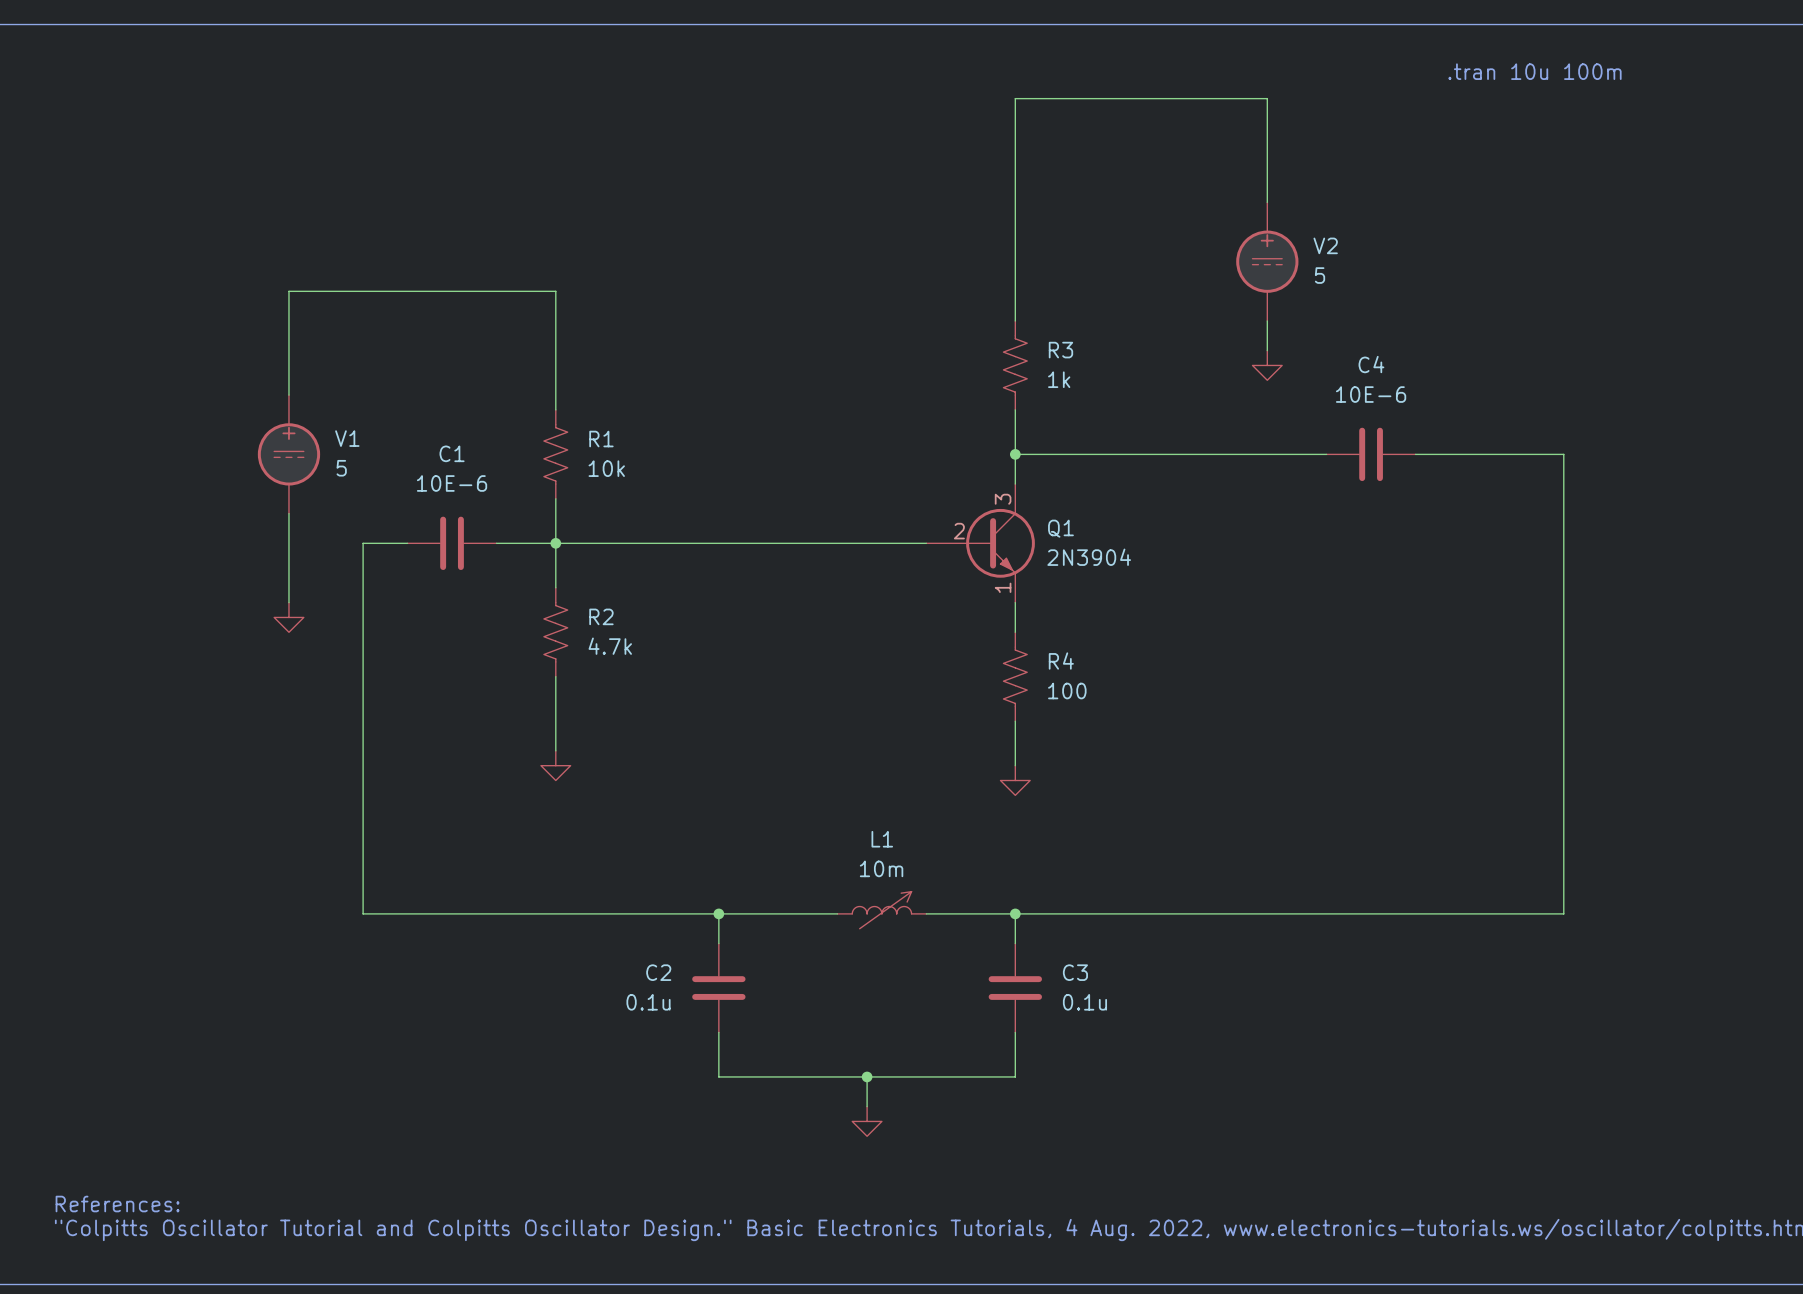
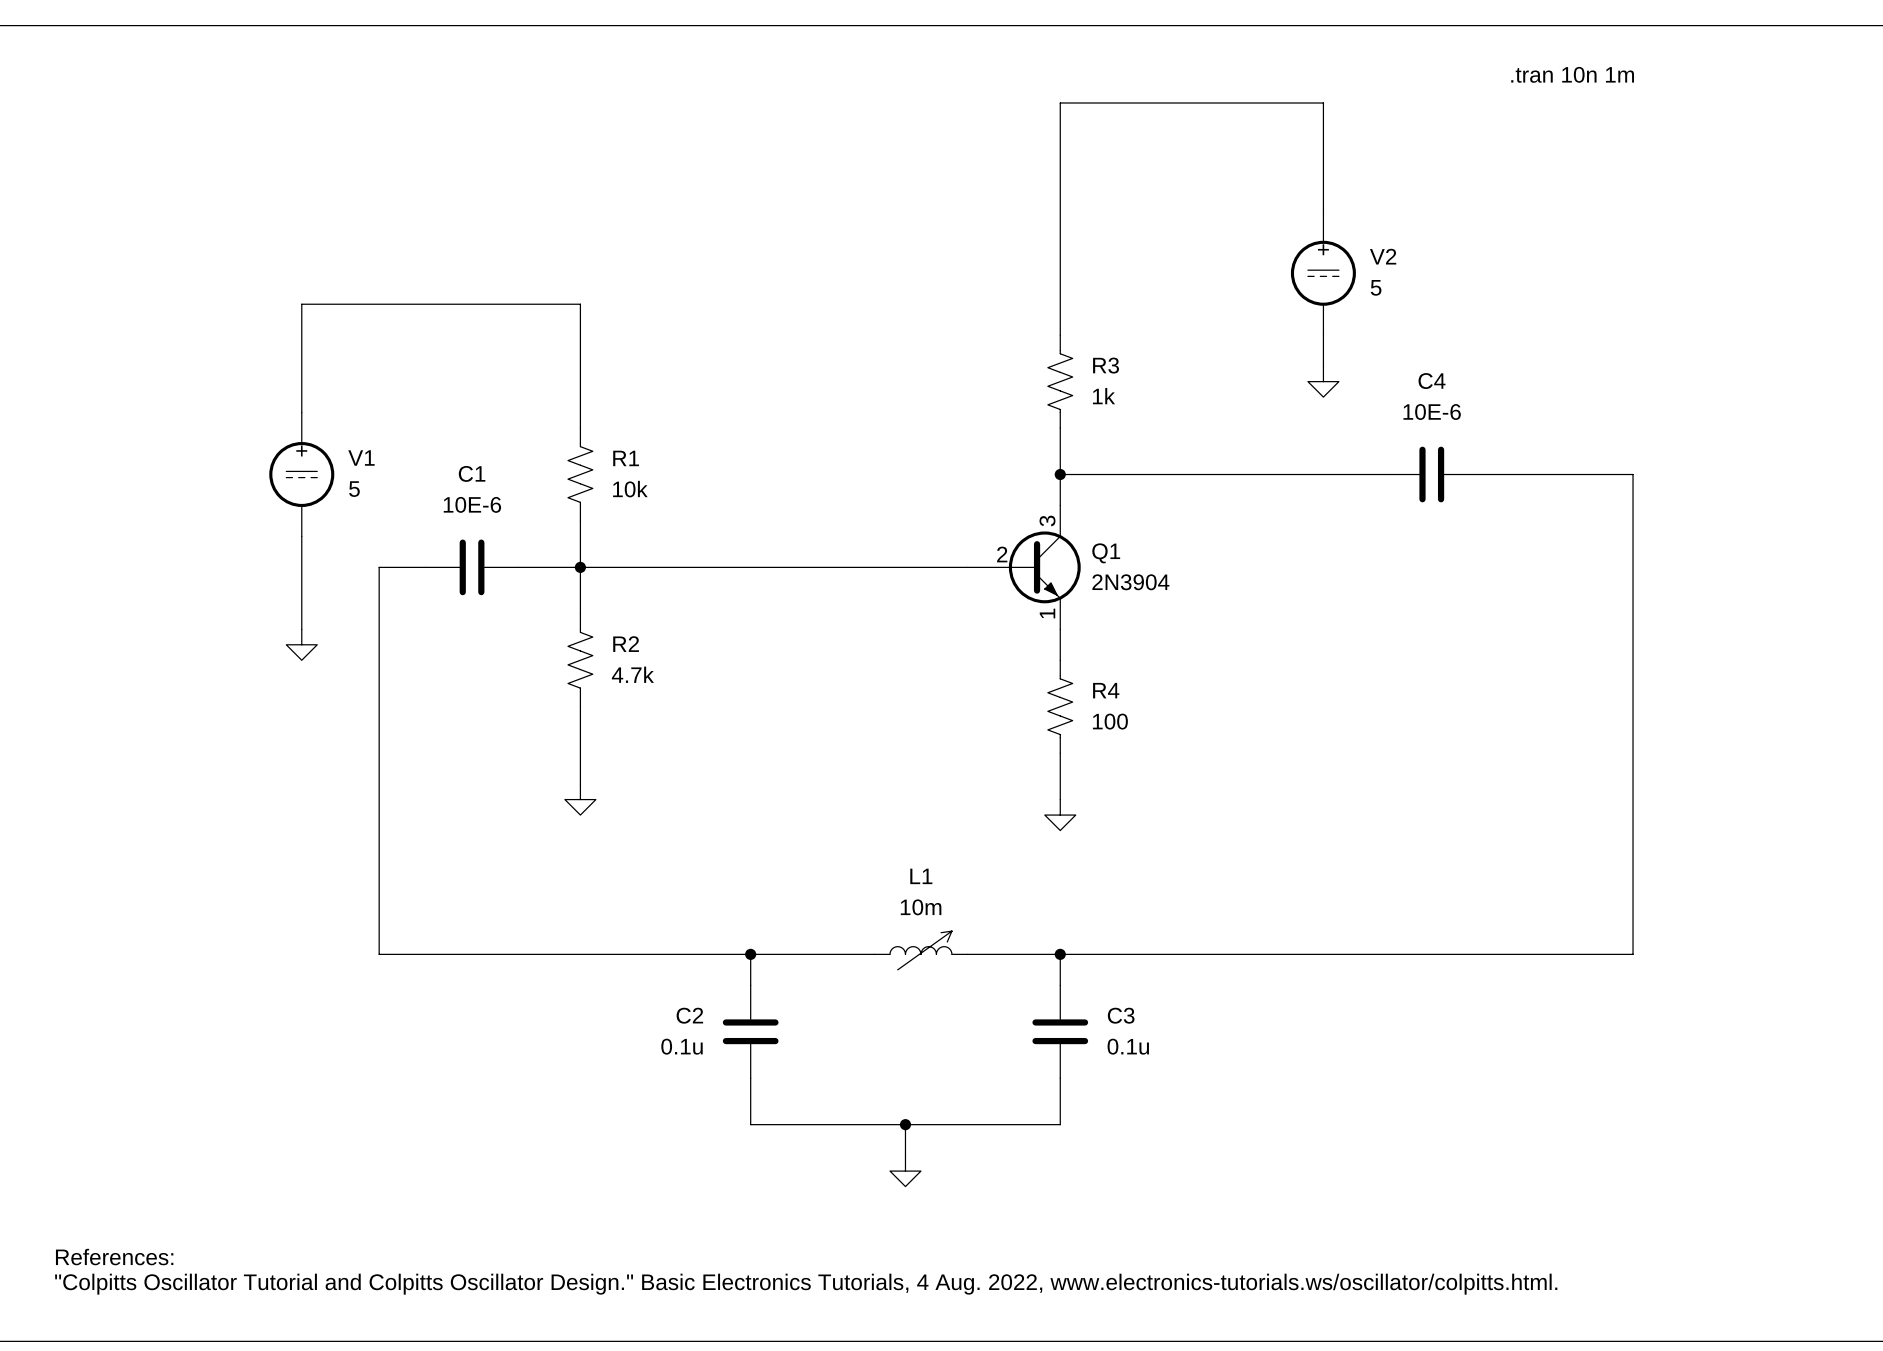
text: .tran 10u 100m (1534, 71) -> .tran 10n 1m (1572, 74)

